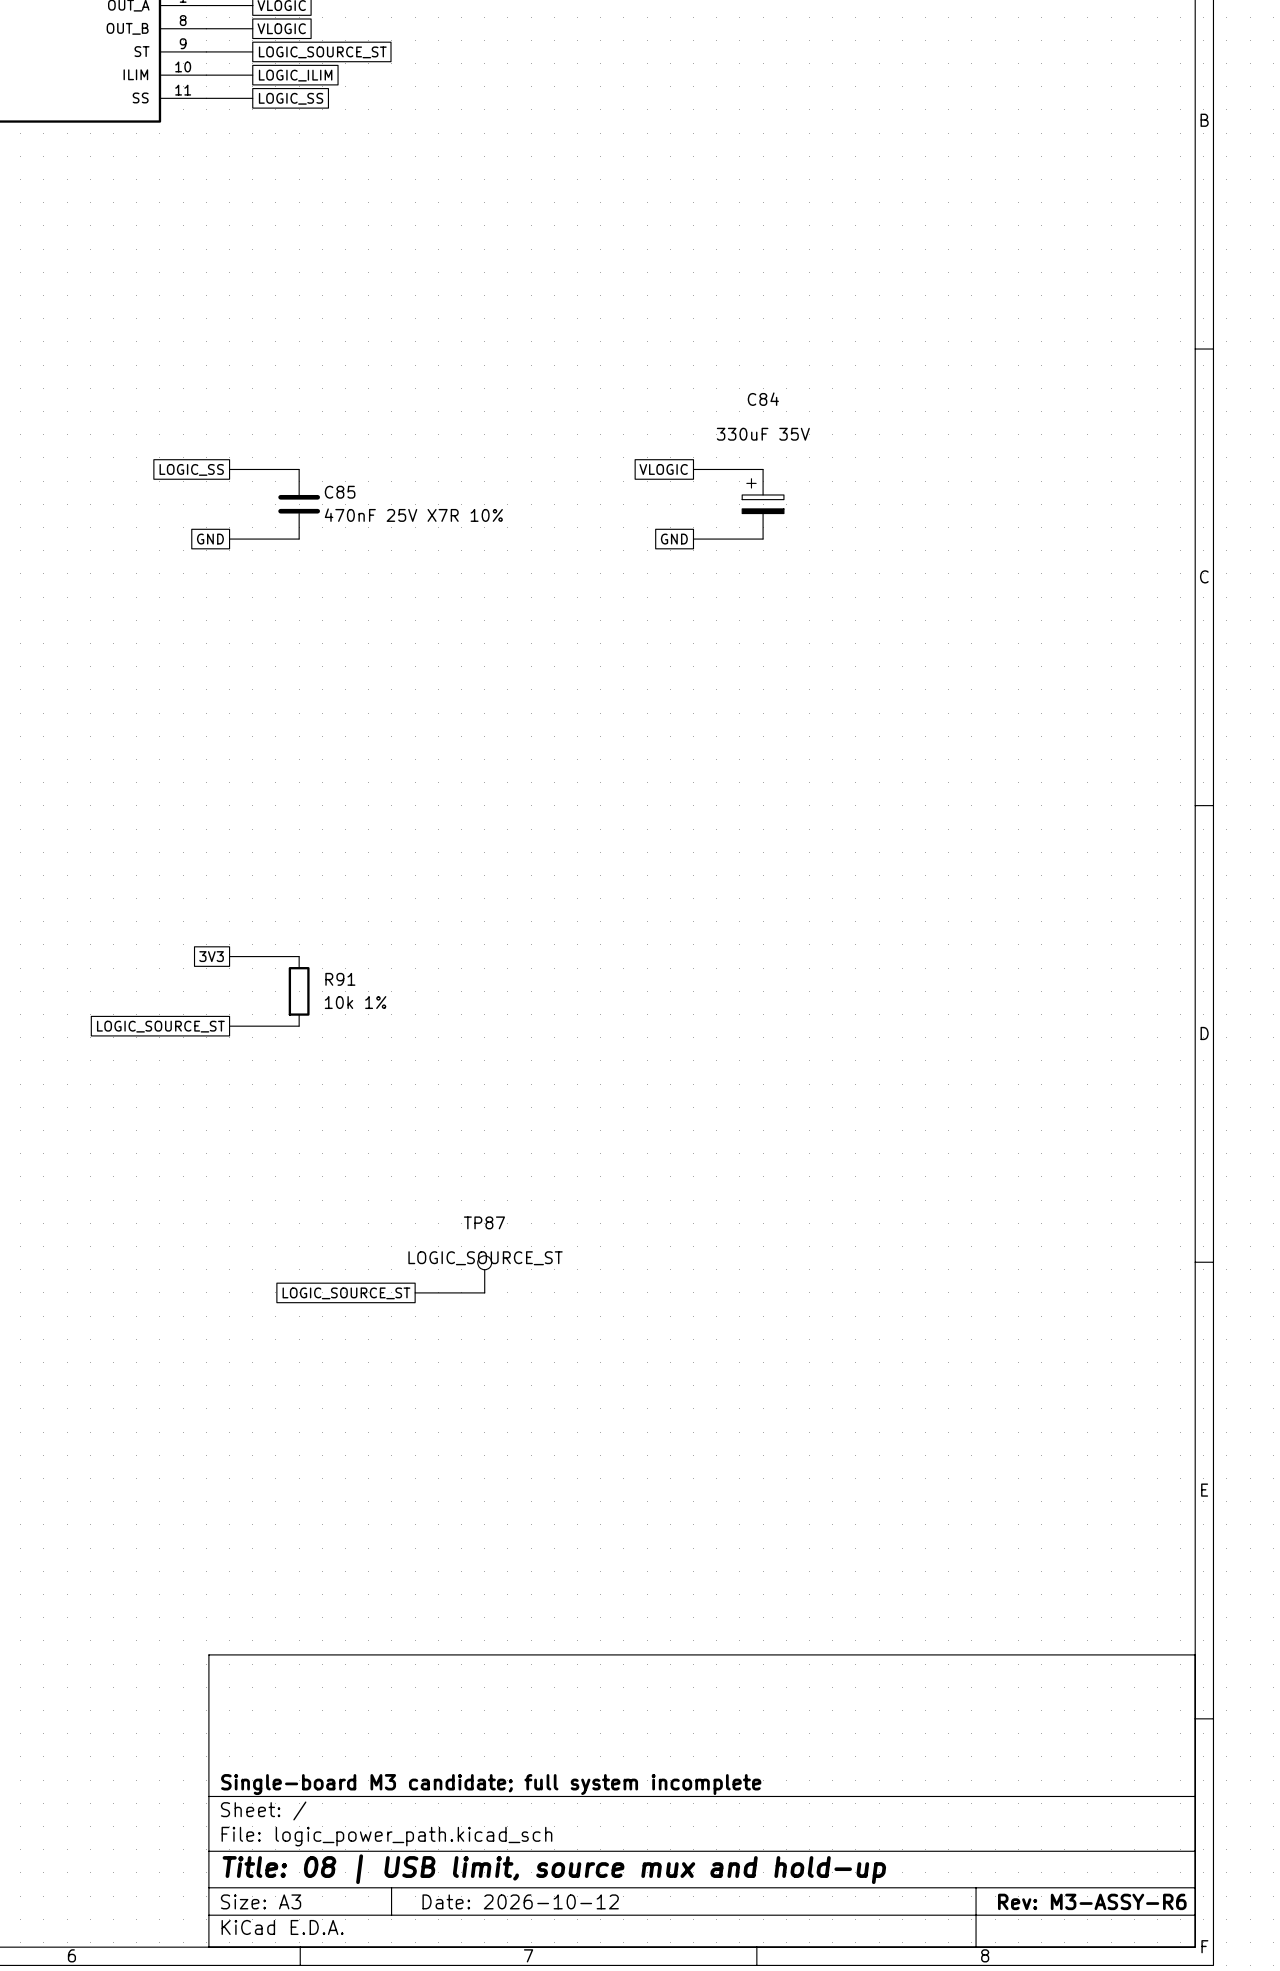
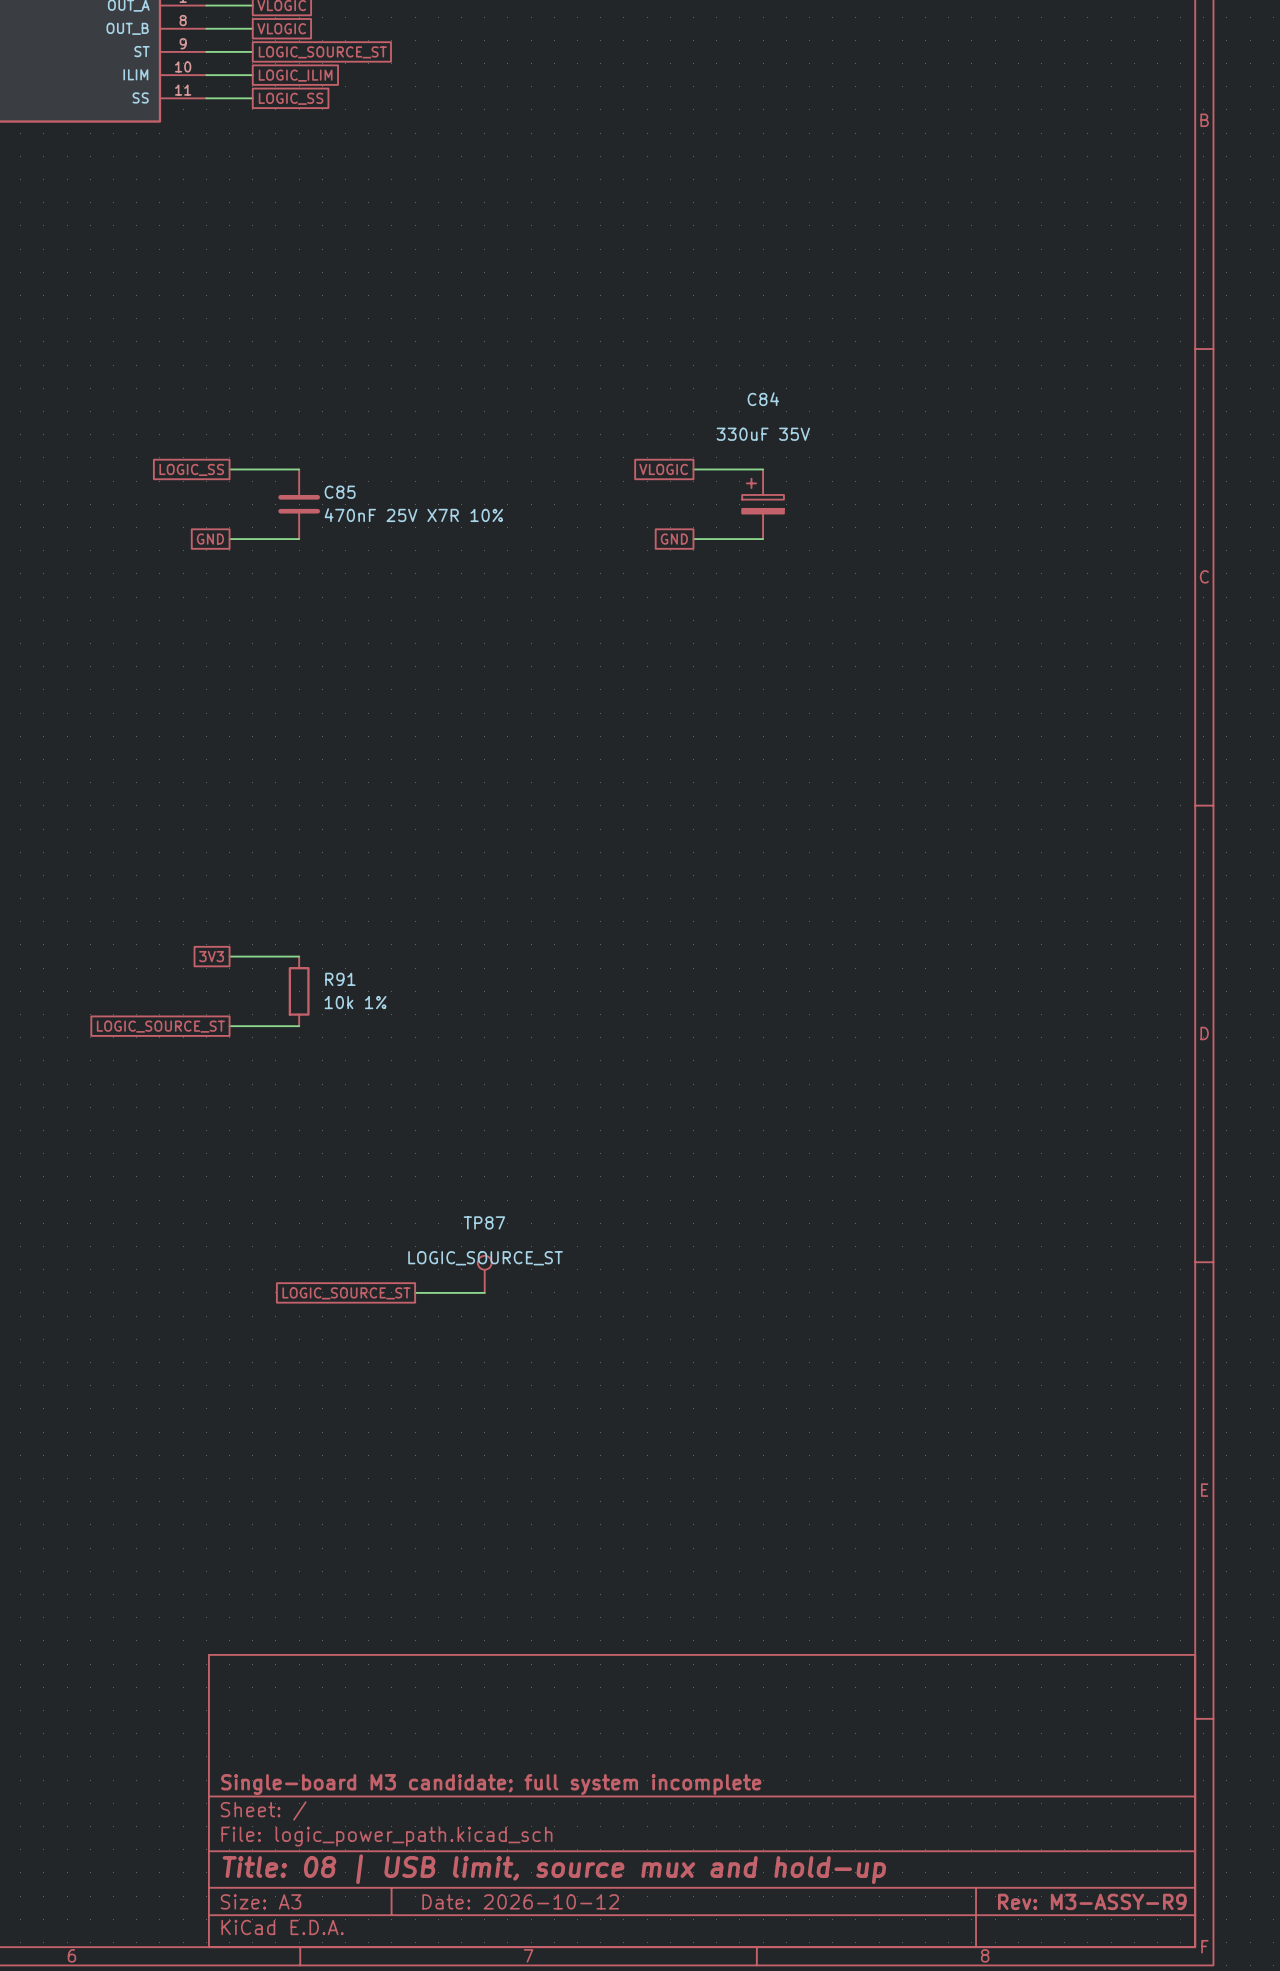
title block: Rev: M3-ASSY-R6 (1092, 1901) -> Rev: M3-ASSY-R9 (1092, 1901)

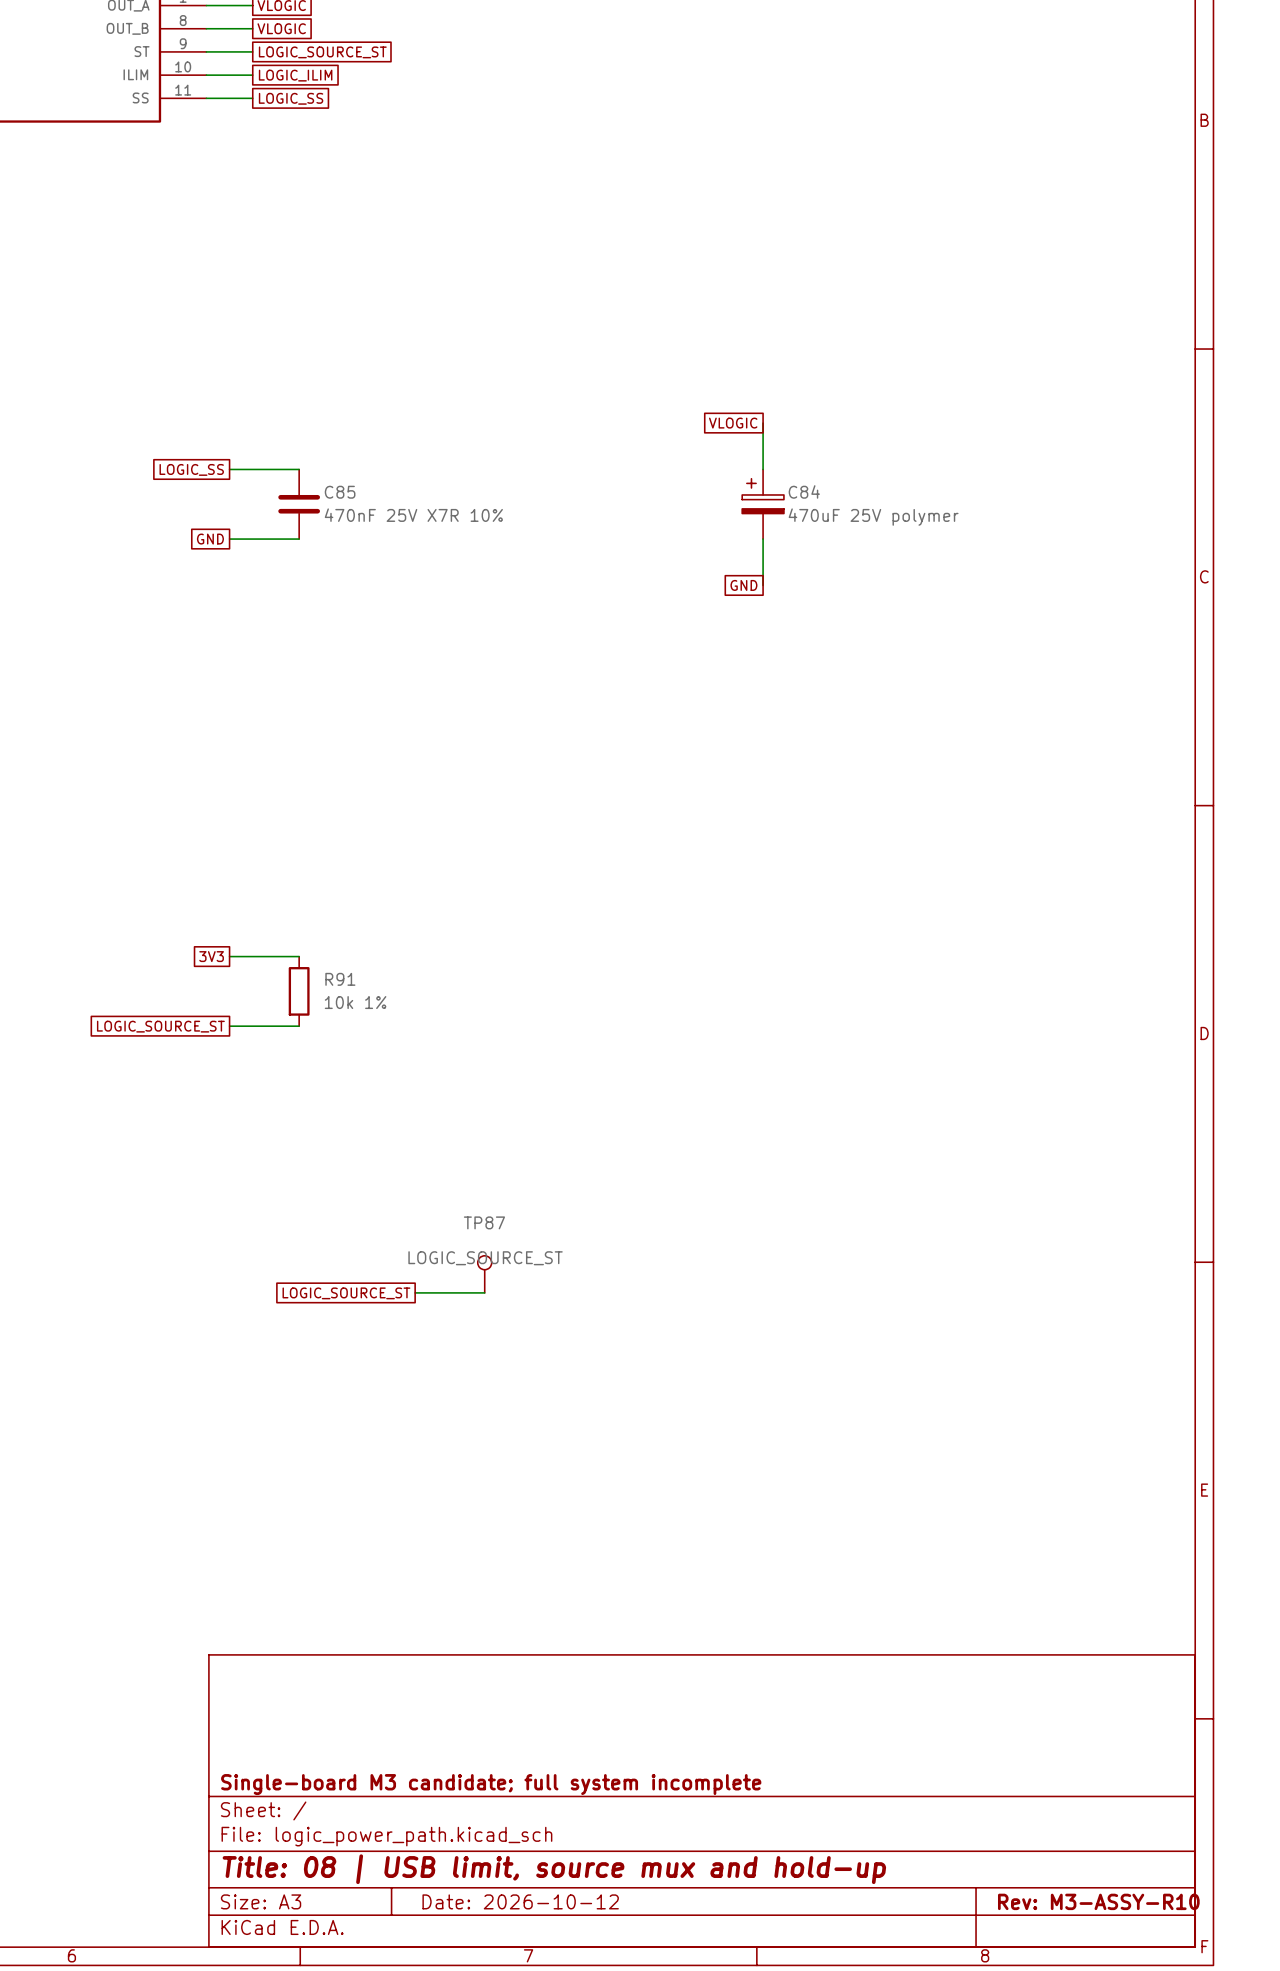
C84 name position: C84 (763, 399) -> C84 (804, 491)
C84 value: 330uF 35V (763, 434) -> 470uF 25V polymer (873, 517)
global label position: VLOGIC (663, 469) -> VLOGIC (733, 423)
wire: (693, 469) (763, 469) -> (763, 423) (763, 469)
global label position: GND (674, 539) -> GND (743, 585)
wire: (693, 539) (763, 539) -> (763, 585) (763, 539)
title block: Rev: M3-ASSY-R9 (1092, 1901) -> Rev: M3-ASSY-R10 (1098, 1901)

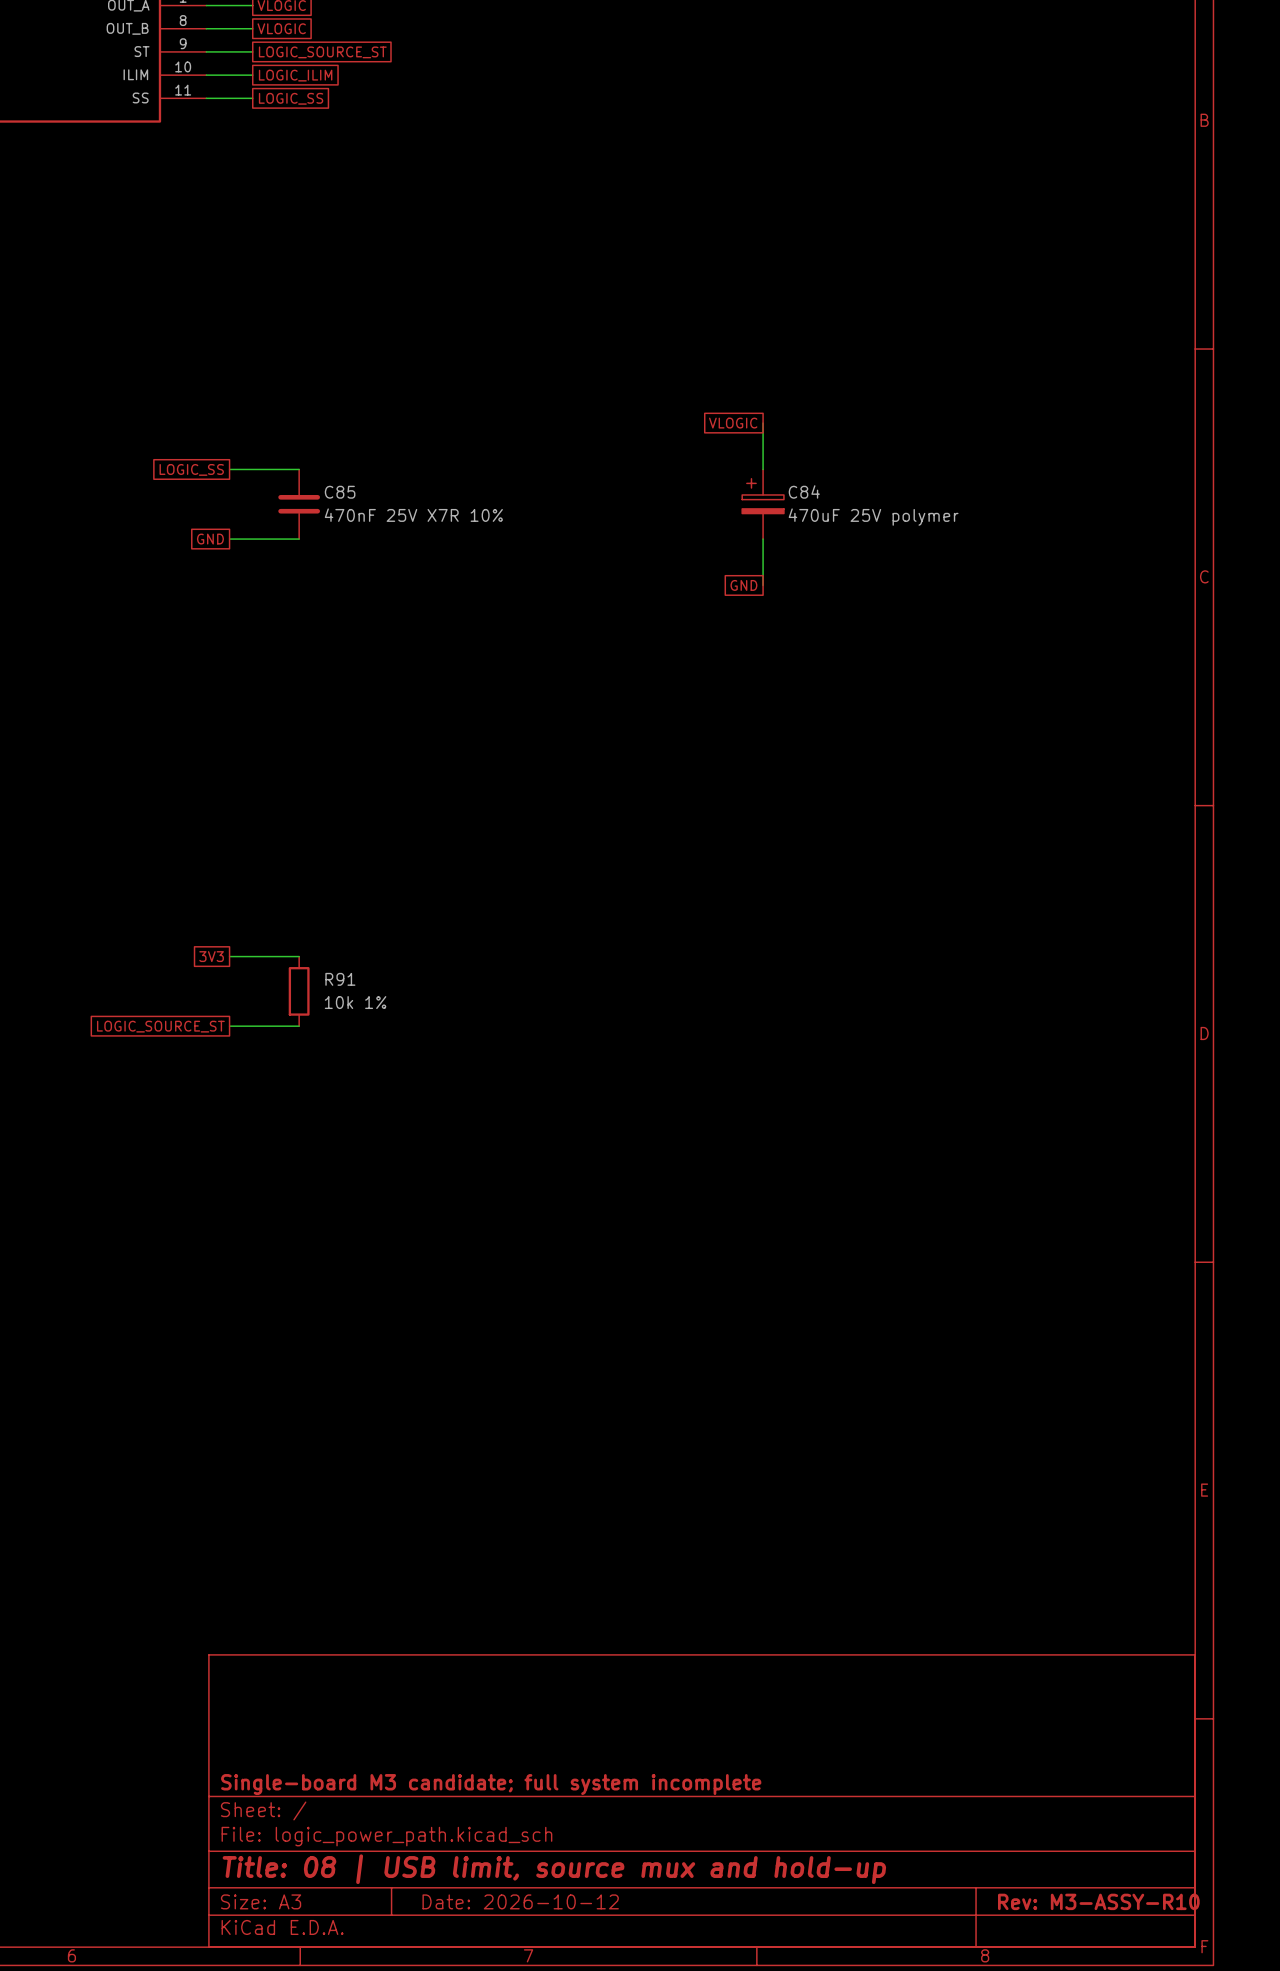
TP87: LOGIC_SOURCE_ST (484, 1274) -> none
wire: (415, 1292) (484, 1292) -> none
global label: LOGIC_SOURCE_ST (346, 1293) -> none

